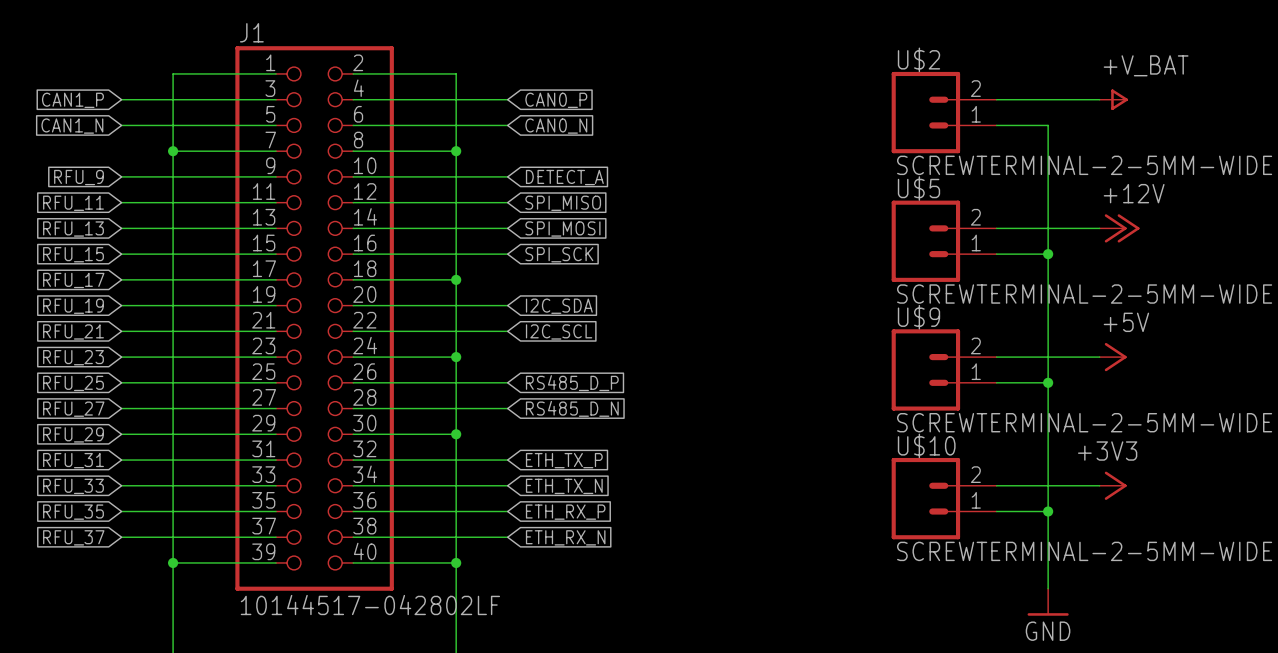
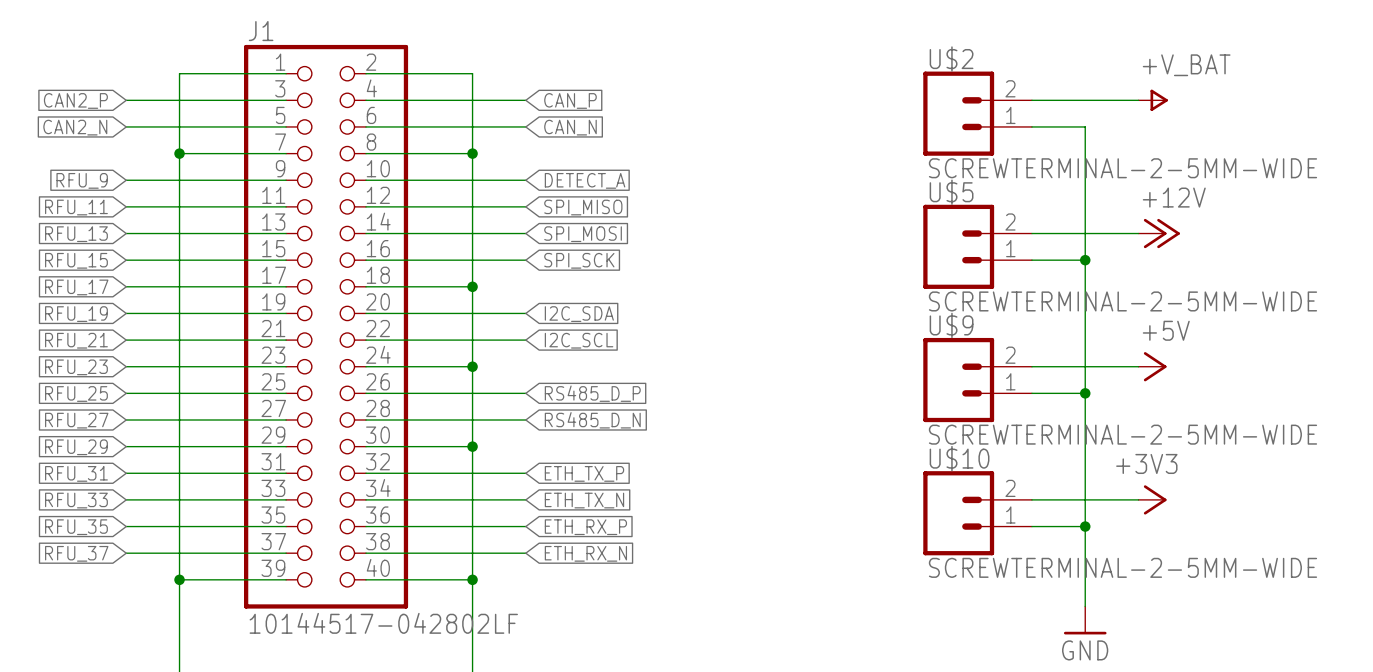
global label: CAN1_P (72, 100) -> CAN2_P (75, 100)
global label: CAN0_P (556, 100) -> CAN_P (570, 100)
global label: CAN1_N (72, 126) -> CAN2_N (75, 127)
global label: CAN0_N (556, 126) -> CAN_N (570, 127)

